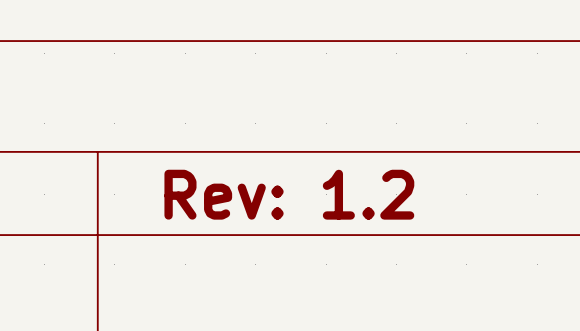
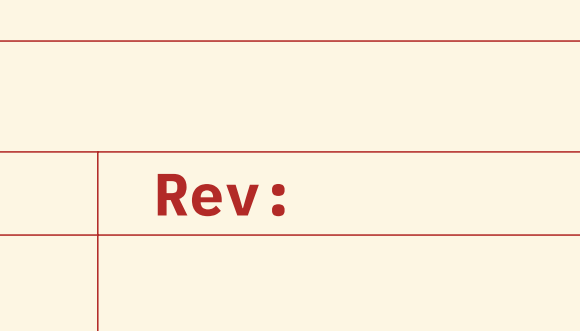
title block: Rev: 1.2 (289, 194) -> Rev: (221, 195)

